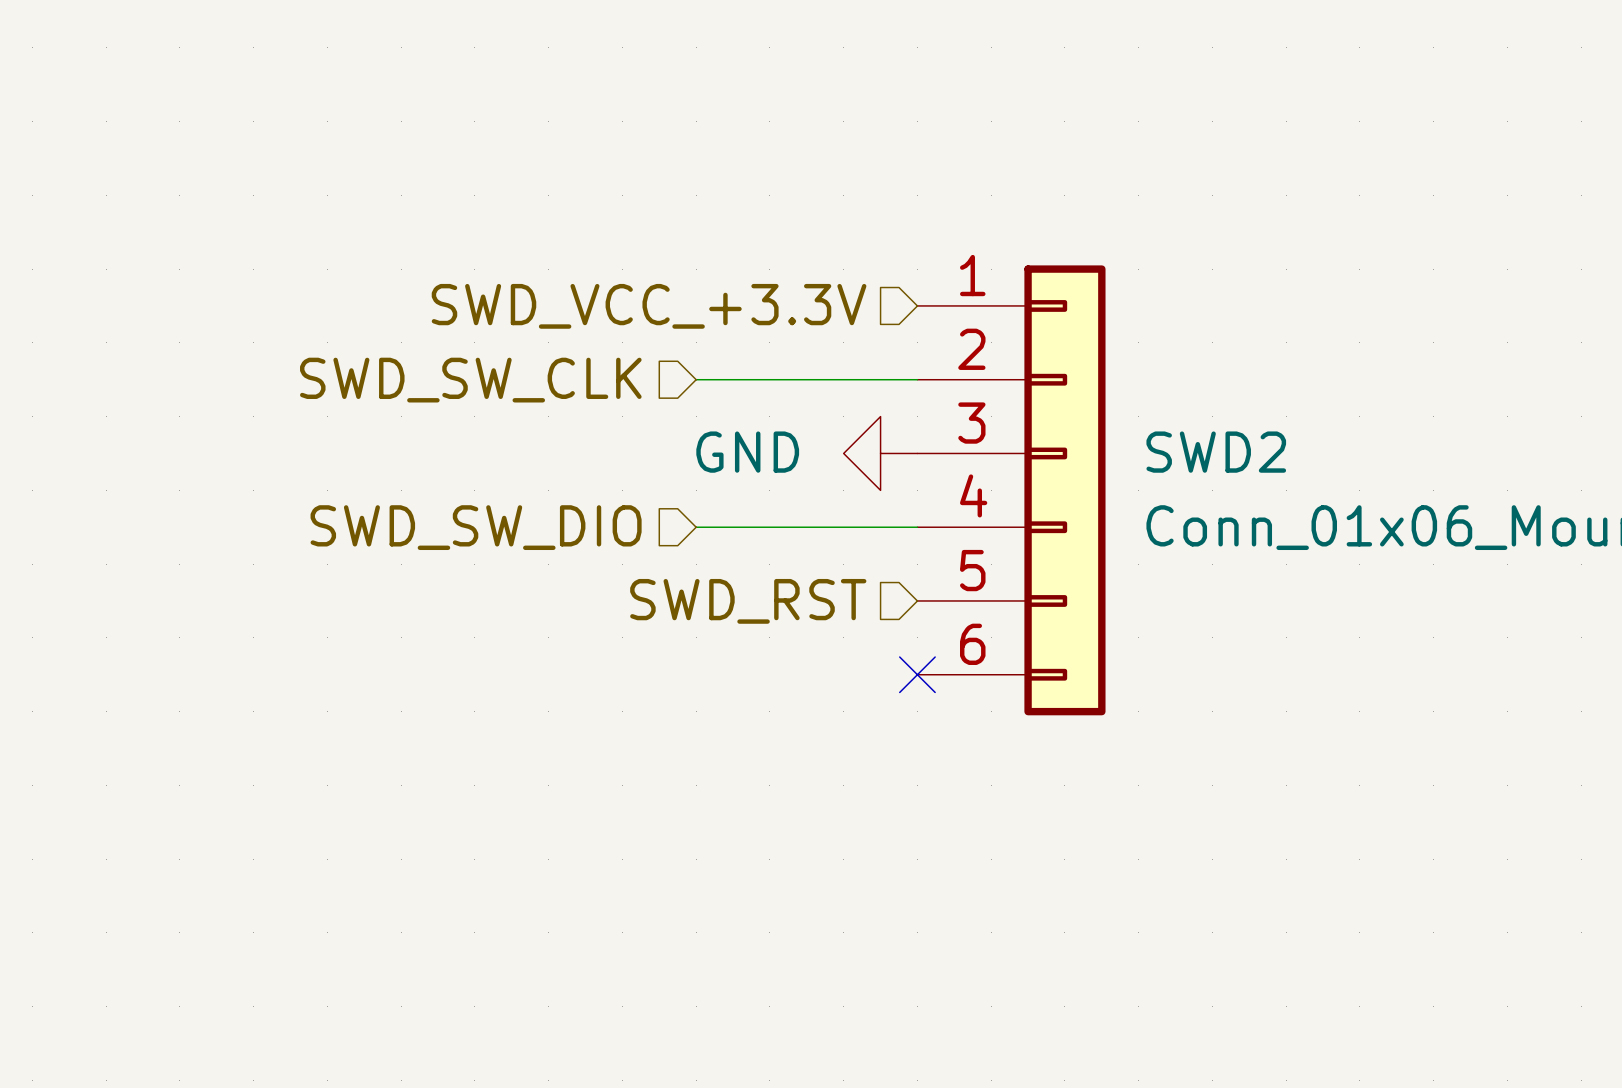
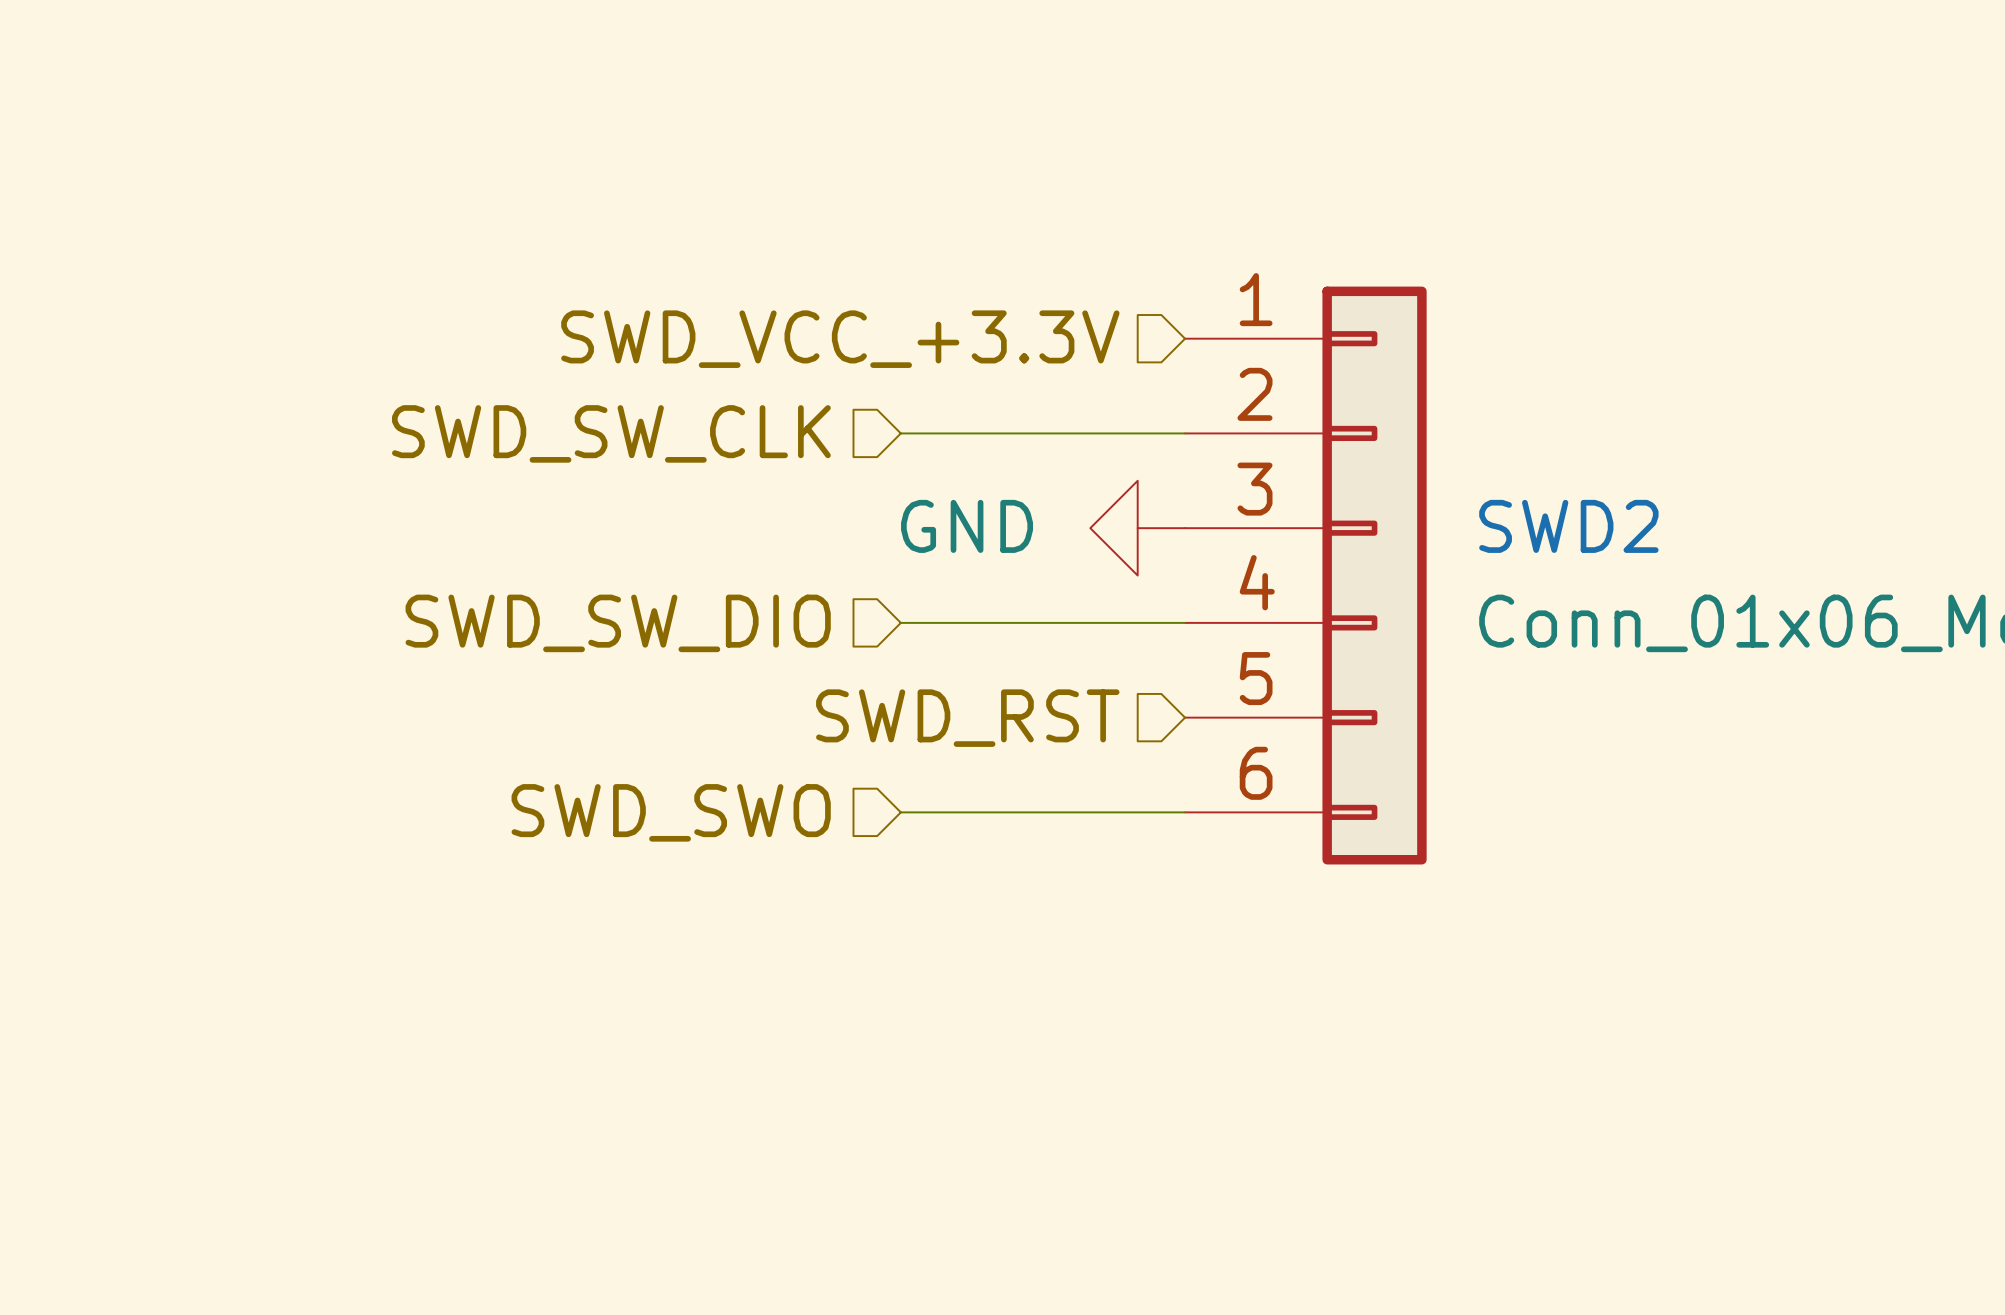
wire: none -> (900, 812) (1185, 812)
no-connect mark: (917, 674) -> none
hierarchical label: none -> SWD_SWO (671, 812)

